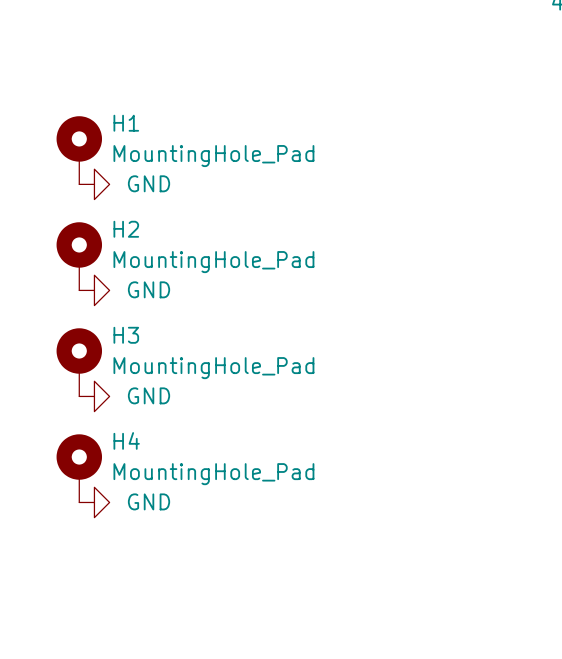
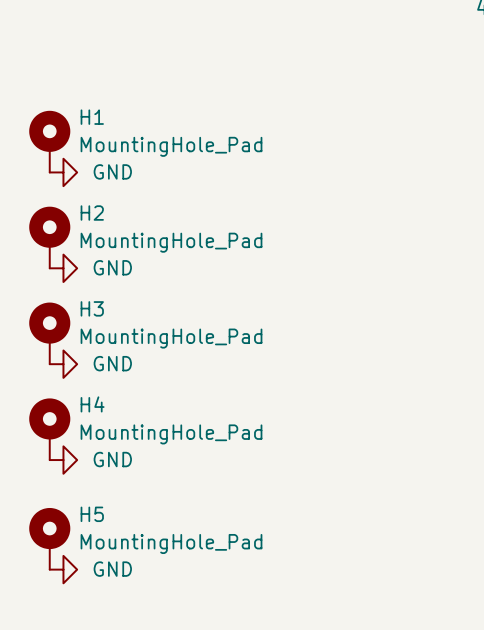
H5: none -> MountingHole_Pad (49, 538)
power symbol: none -> GND (63, 569)

